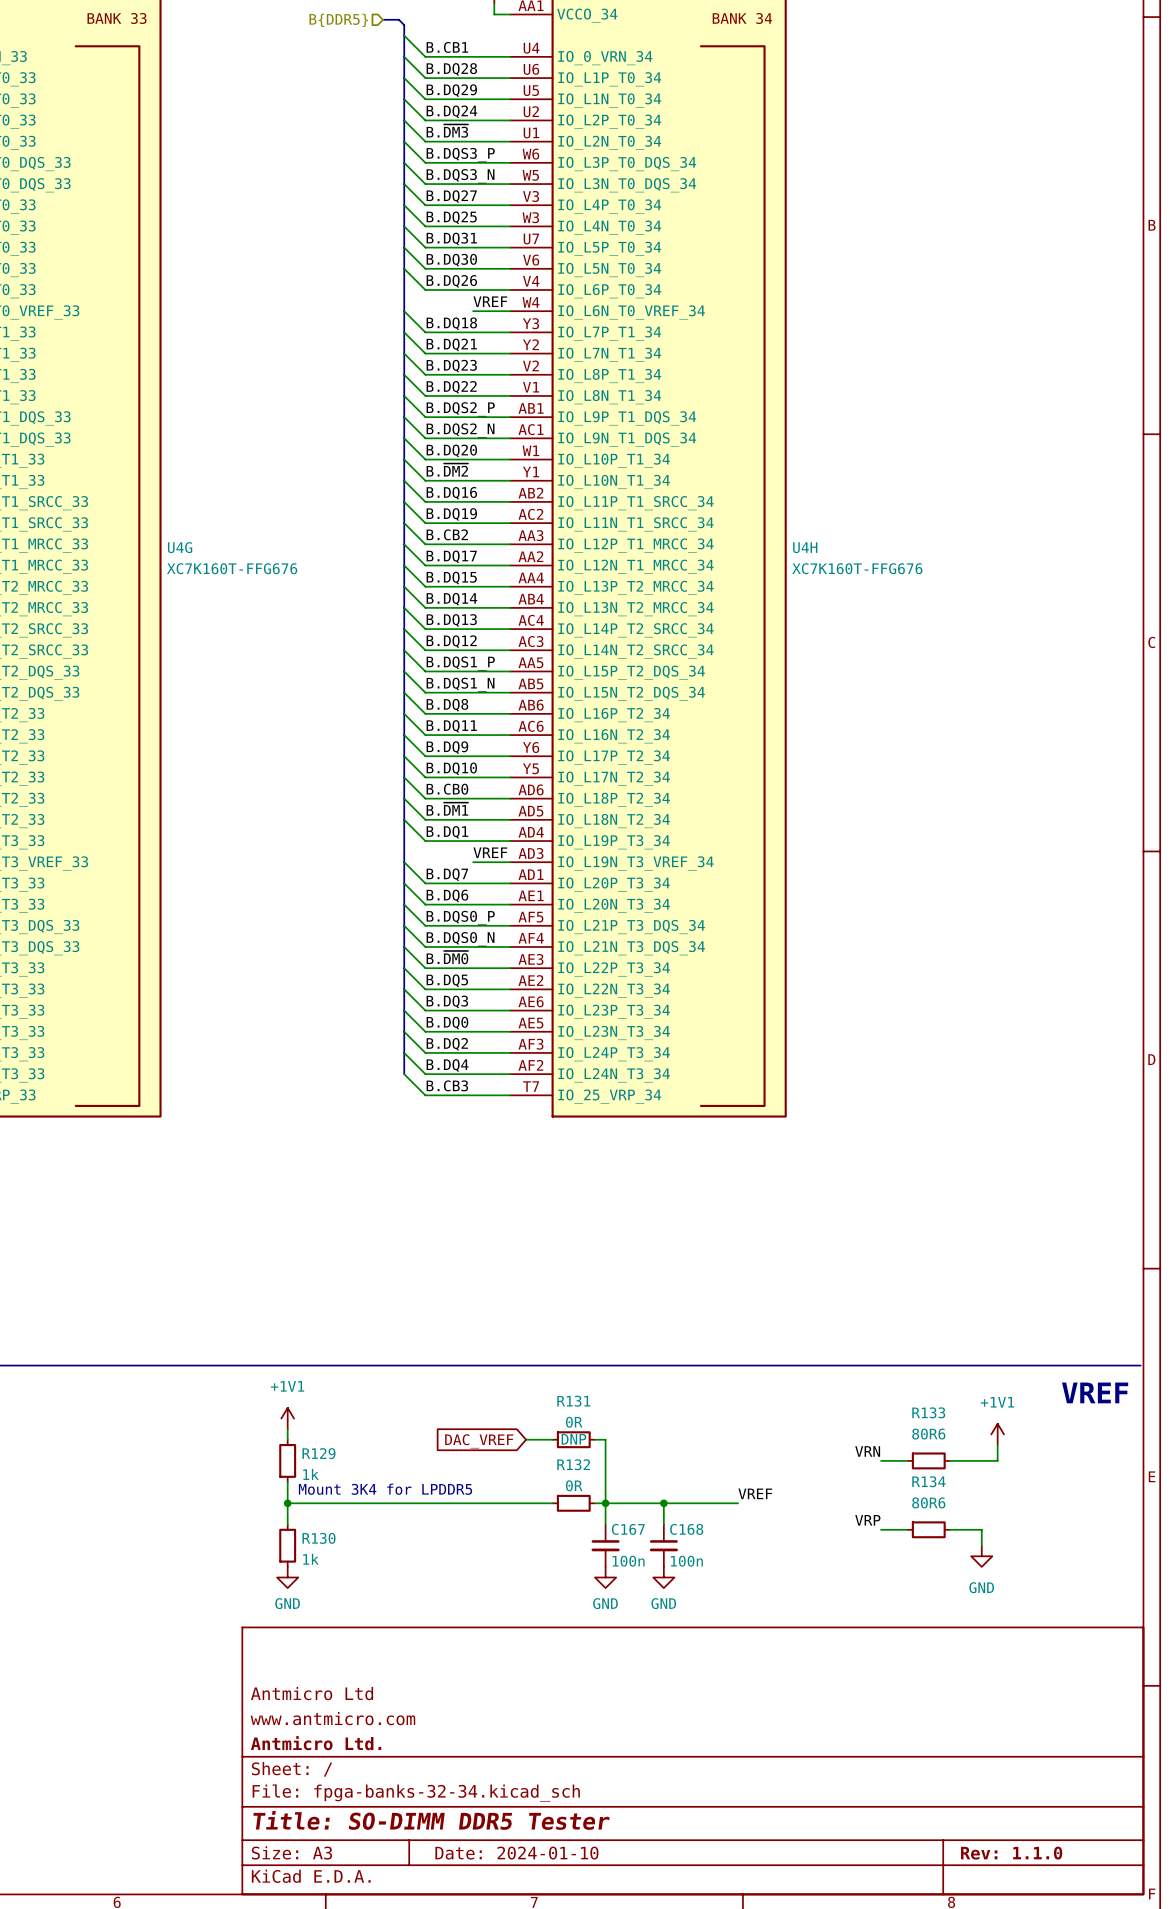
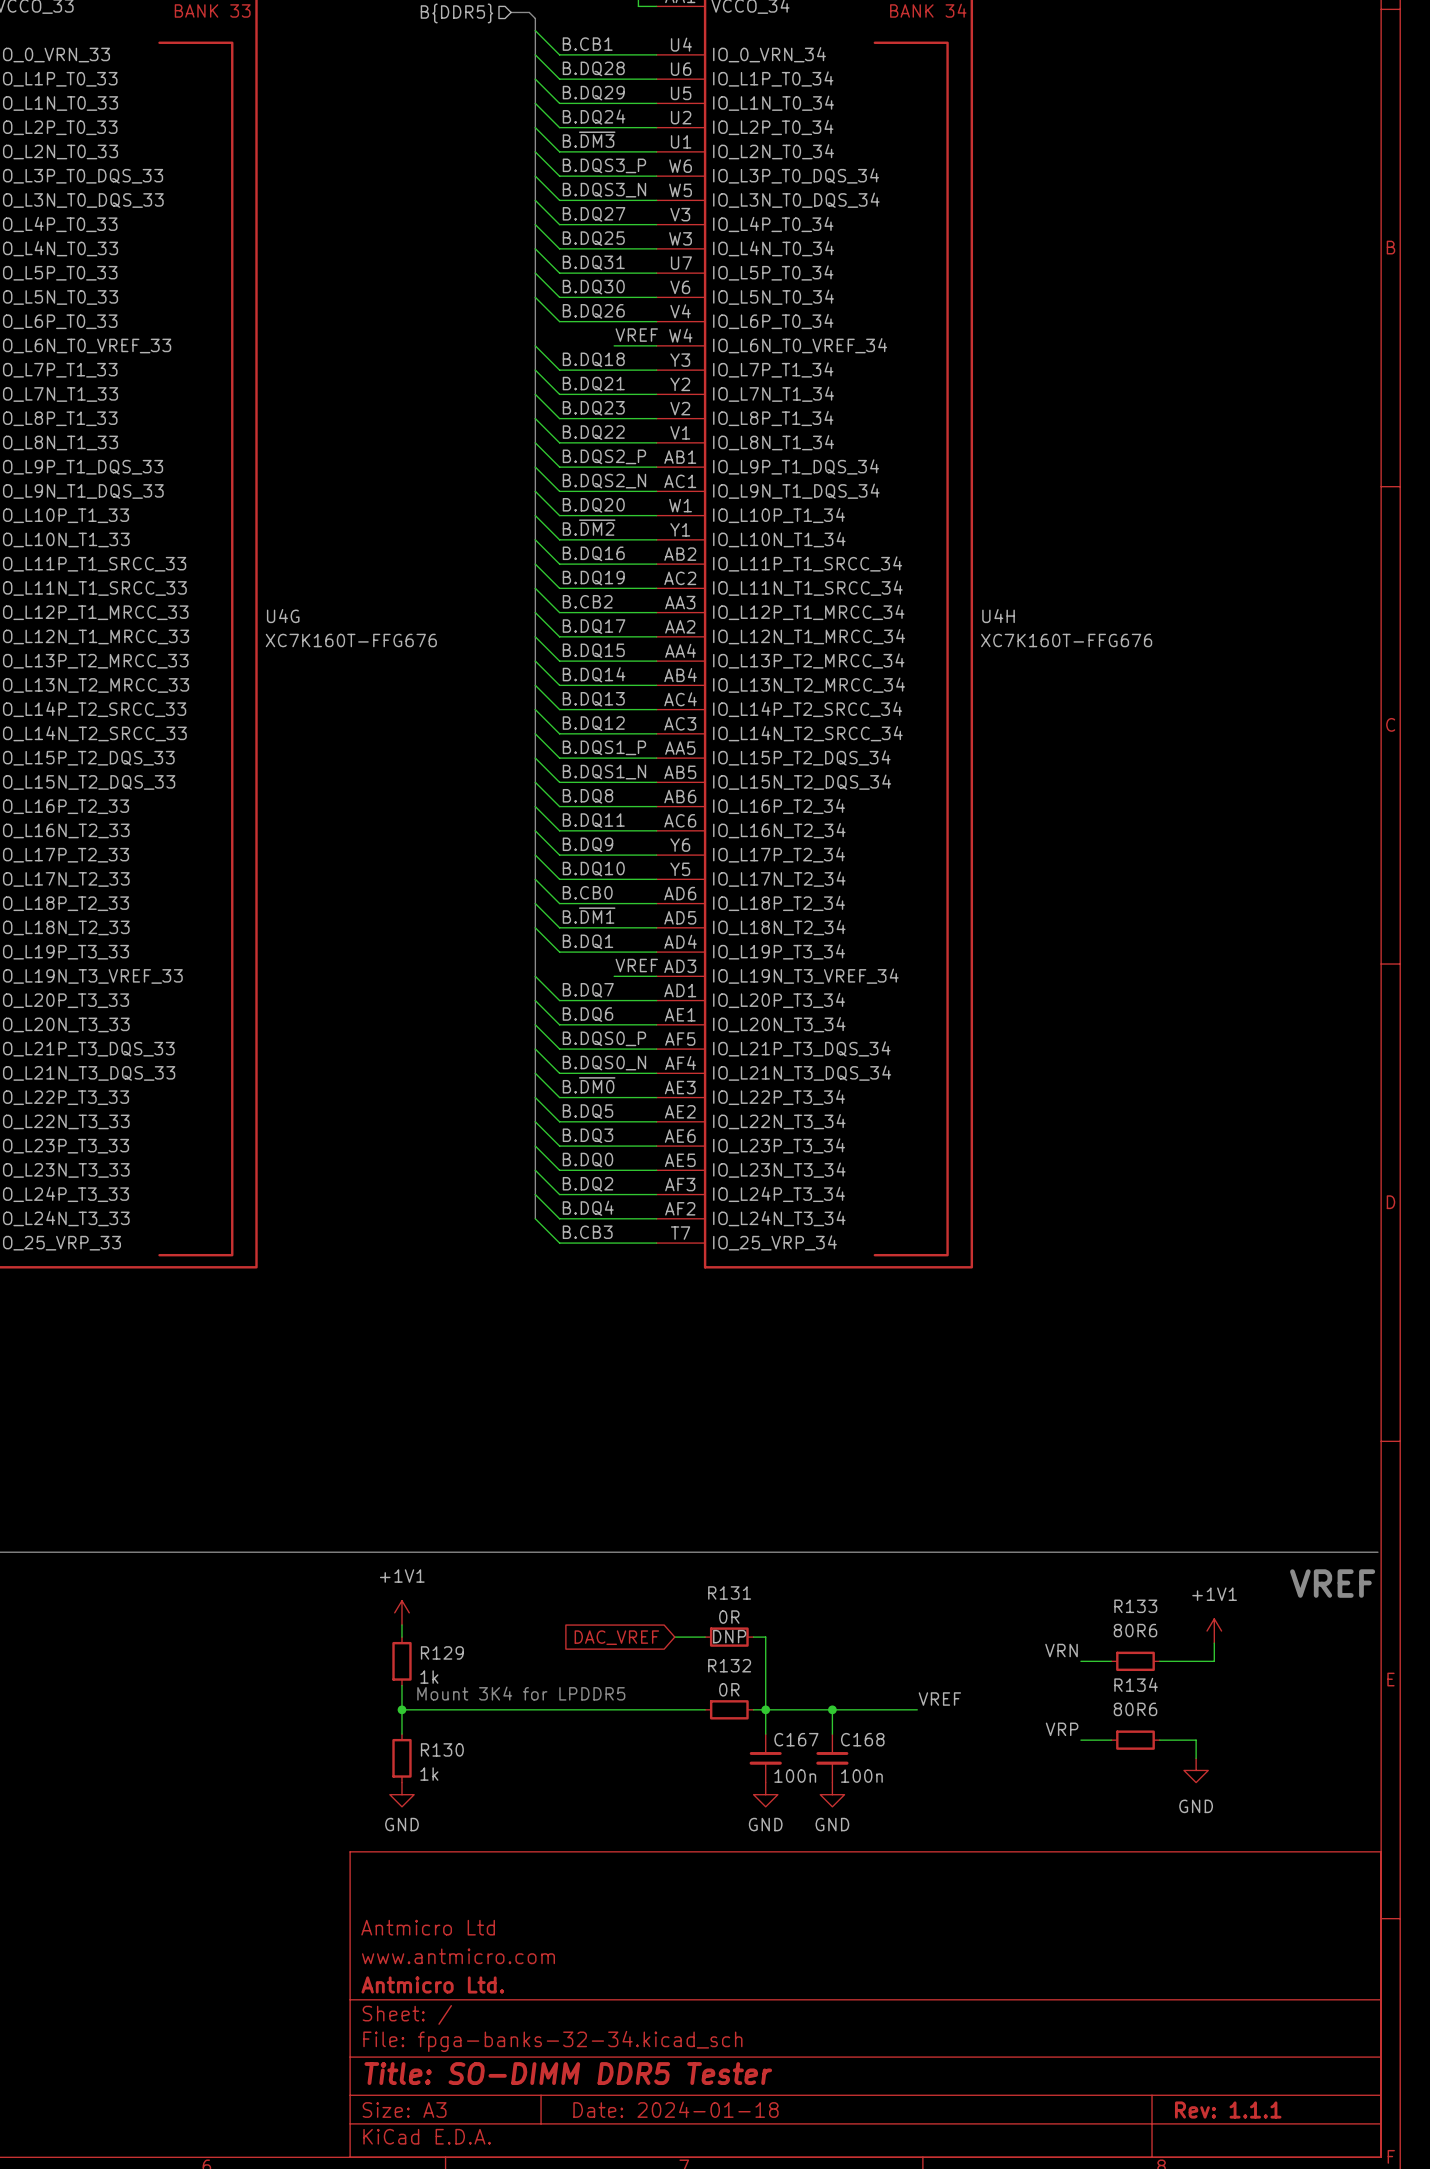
title block: Date: 2024-01-10 (516, 1853) -> Date: 2024-01-18 (675, 2109)
title block: Rev: 1.1.0 (1011, 1853) -> Rev: 1.1.1 (1228, 2110)

